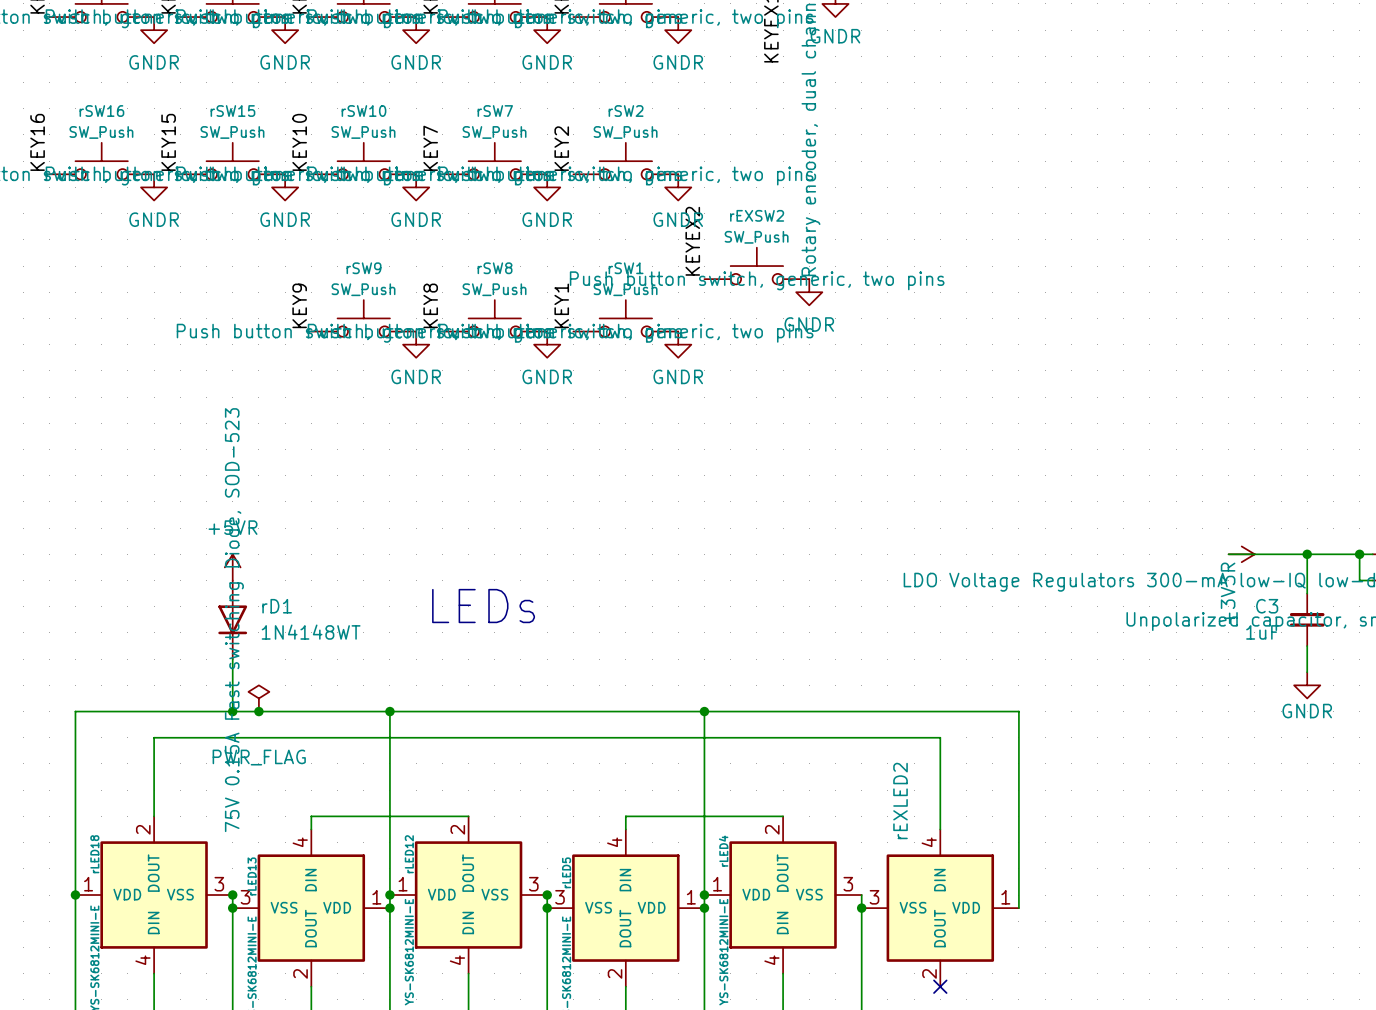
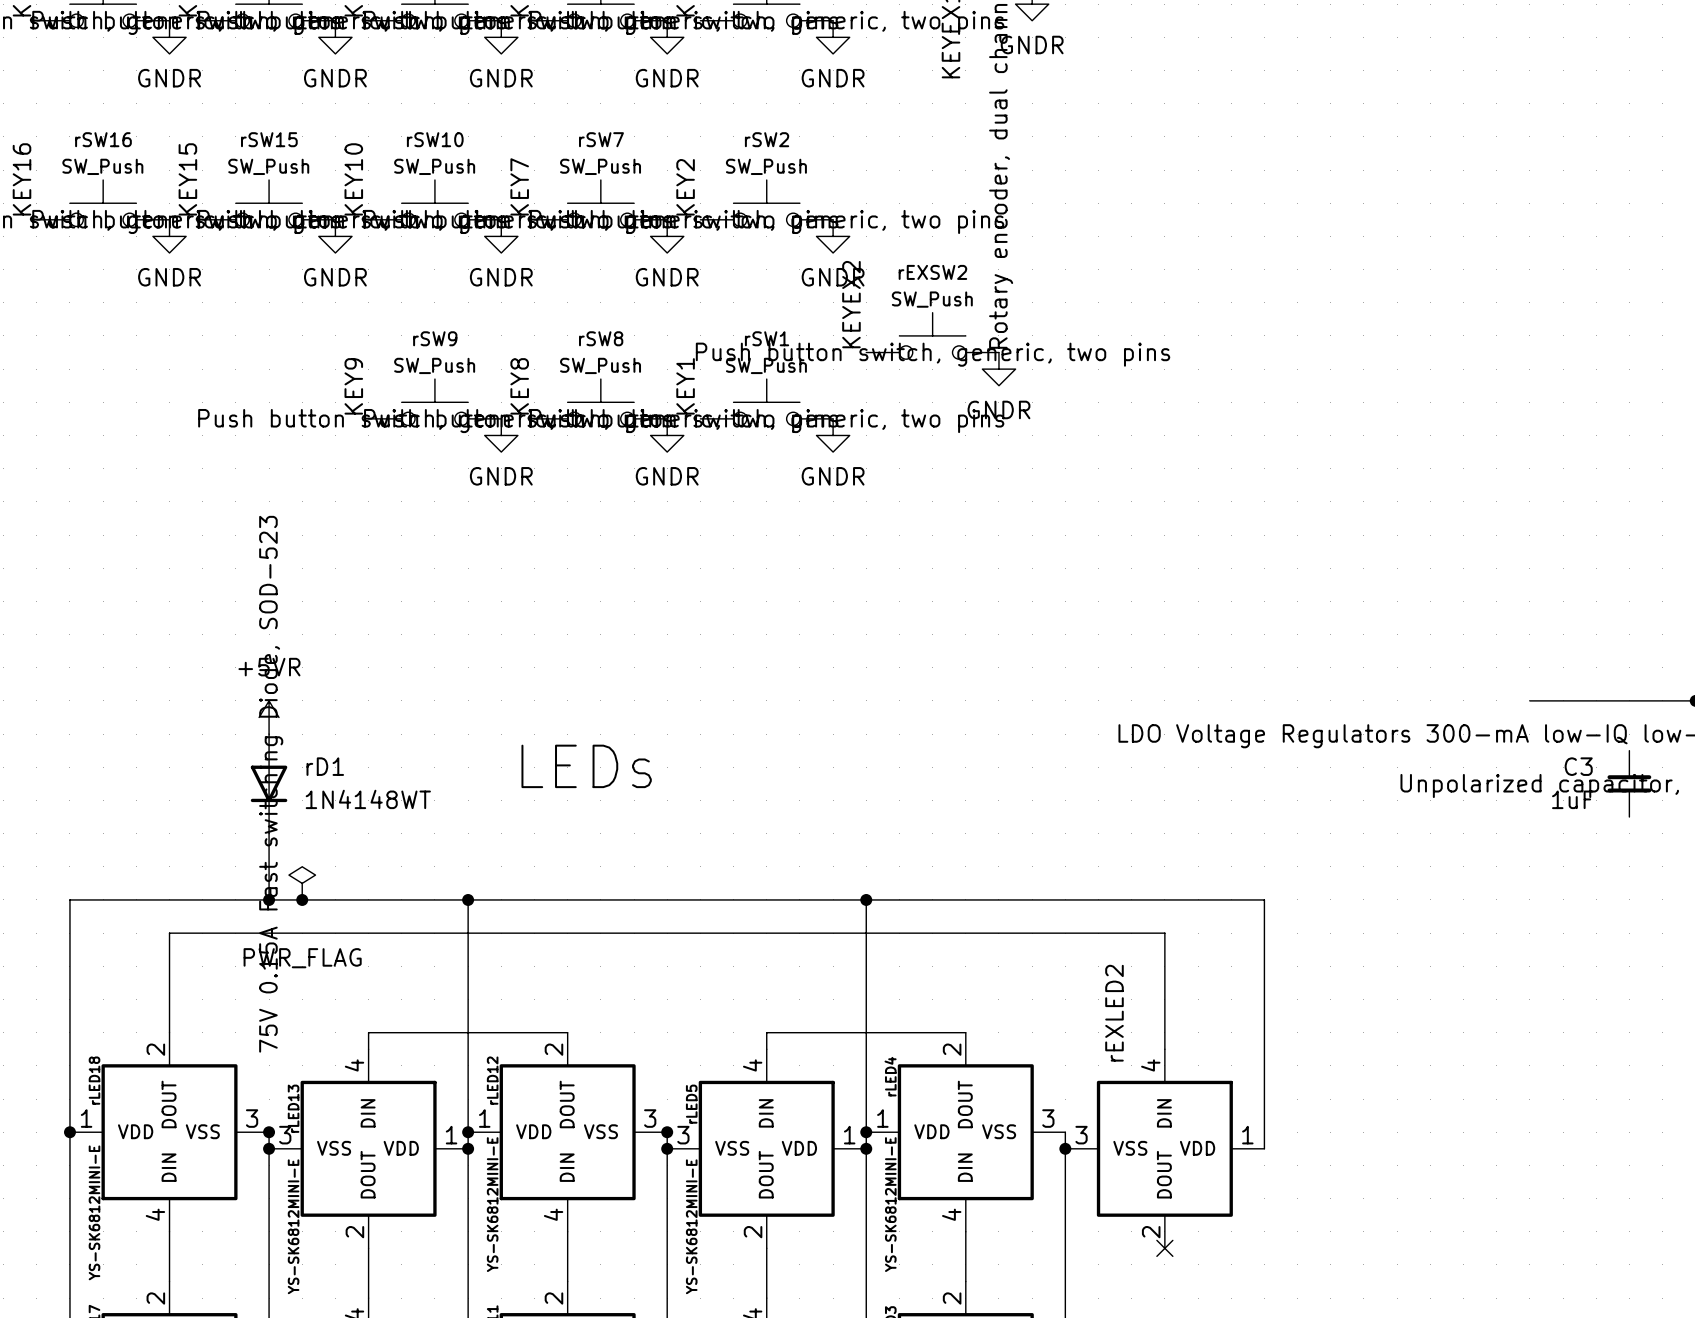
power symbol: +3V3R (1241, 554) -> none
wire: (1307, 554) (1307, 593) -> none
junction: (1307, 554) -> none
wire: (1307, 646) (1307, 672) -> none
power symbol: GNDR (1307, 685) -> none

